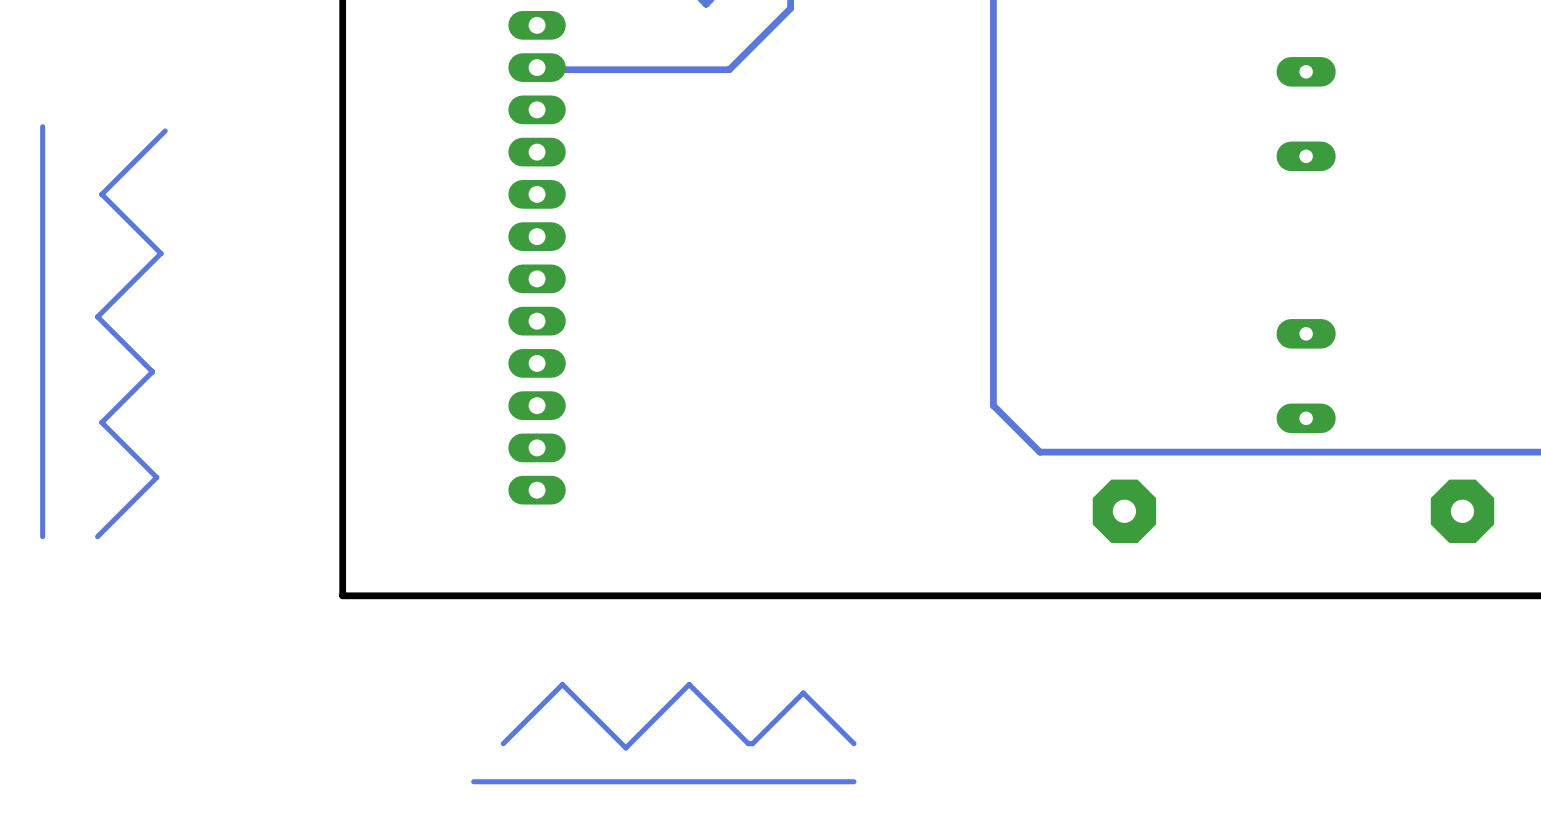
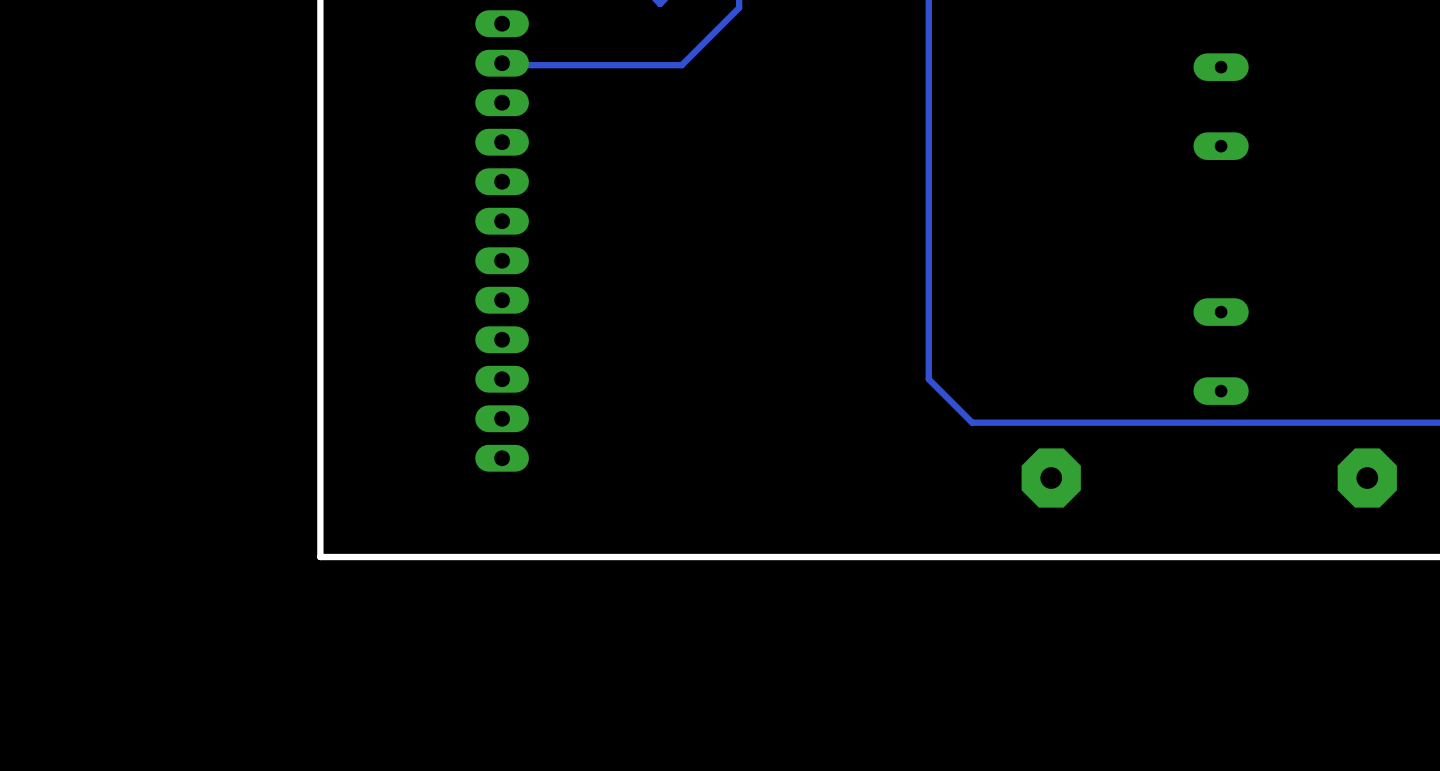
track: (42, 126) (42, 536) -> none
track: (165, 130) (101, 194) (160, 253) (97, 316) (152, 371) (101, 422) (156, 477) (97, 536) -> none
track: (853, 743) (803, 693) (752, 743) (748, 743) (689, 684) (625, 747) (562, 684) (503, 743) -> none
track: (853, 781) (473, 781) -> none

